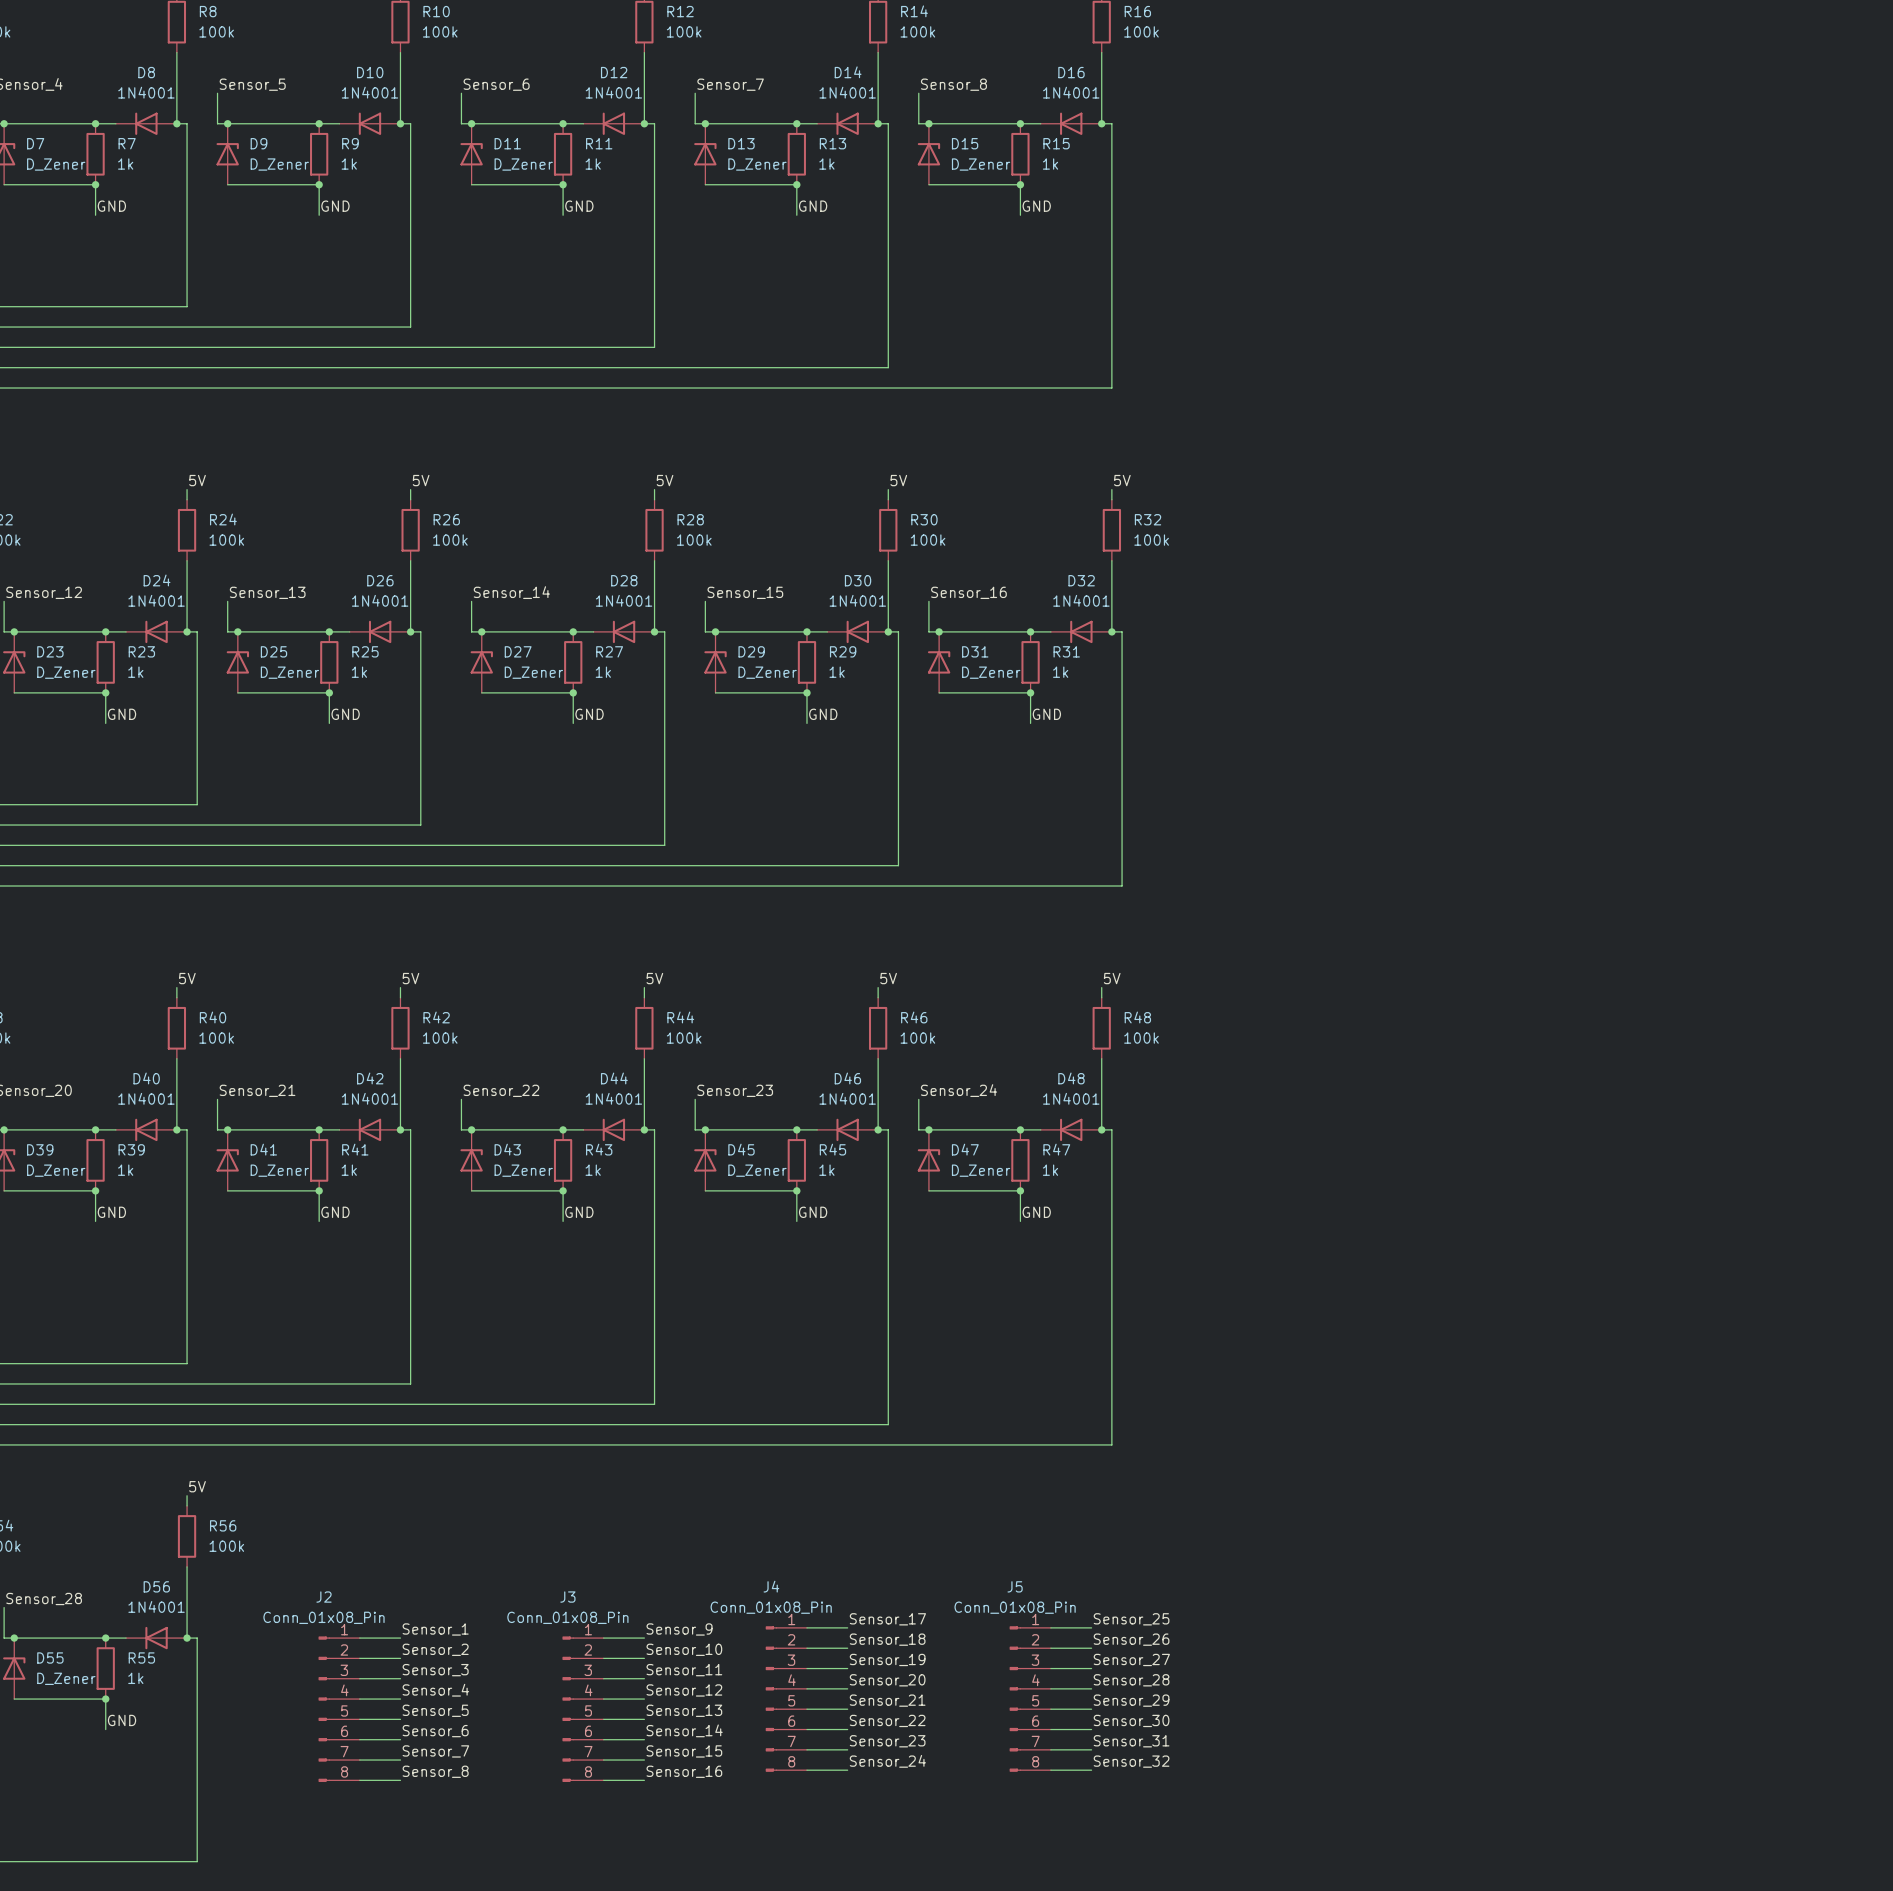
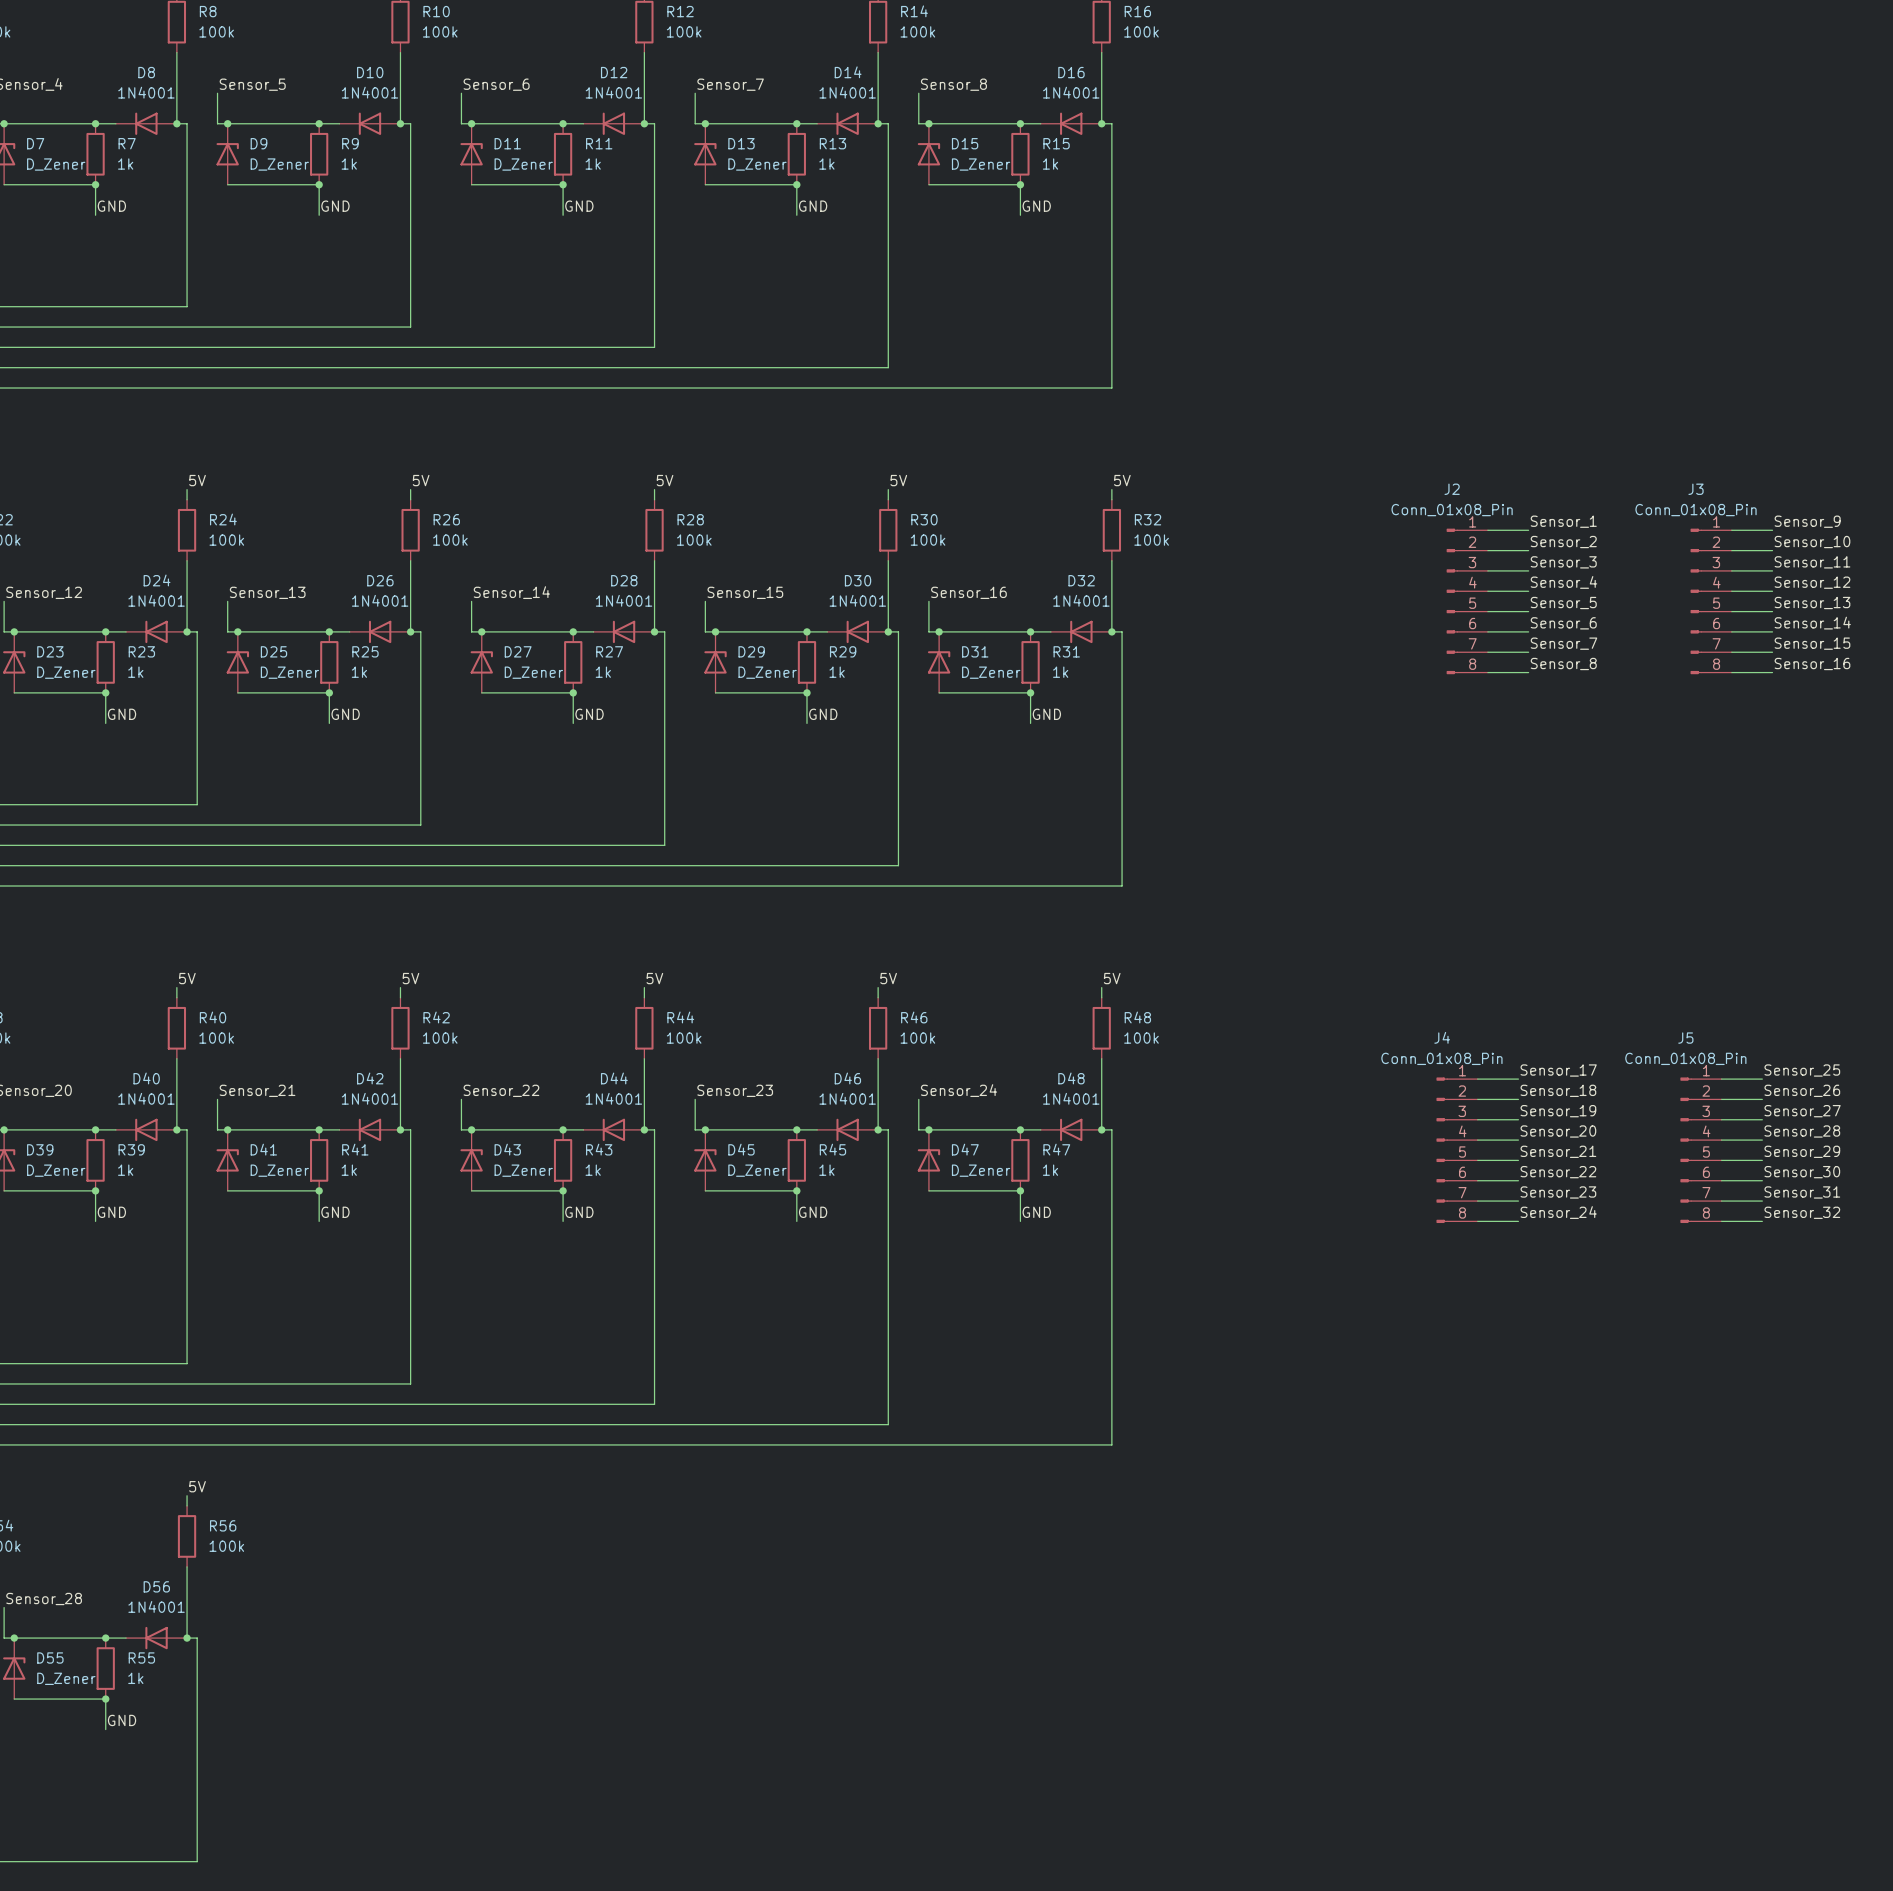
label: none -> Sensor_1 (1563, 521)
label: none -> Sensor_9 (1807, 521)
wire: none -> (1487, 530) (1528, 530)
wire: none -> (1731, 530) (1772, 530)
label: none -> Sensor_2 (1563, 542)
label: none -> Sensor_10 (1812, 542)
wire: none -> (1487, 550) (1528, 550)
wire: none -> (1731, 550) (1772, 550)
label: none -> Sensor_3 (1563, 562)
label: none -> Sensor_11 (1812, 562)
wire: none -> (1487, 570) (1528, 570)
wire: none -> (1731, 570) (1772, 570)
label: none -> Sensor_4 (1563, 582)
label: none -> Sensor_12 (1812, 582)
wire: none -> (1487, 591) (1528, 591)
wire: none -> (1731, 591) (1772, 591)
label: none -> Sensor_5 (1563, 603)
label: none -> Sensor_13 (1812, 603)
wire: none -> (1487, 611) (1528, 611)
wire: none -> (1731, 611) (1772, 611)
label: none -> Sensor_6 (1563, 623)
label: none -> Sensor_14 (1812, 623)
wire: none -> (1487, 631) (1528, 631)
wire: none -> (1731, 631) (1772, 631)
label: none -> Sensor_7 (1563, 643)
label: none -> Sensor_15 (1812, 643)
wire: none -> (1487, 652) (1528, 652)
wire: none -> (1731, 652) (1772, 652)
label: none -> Sensor_8 (1563, 663)
label: none -> Sensor_16 (1812, 663)
wire: none -> (1487, 672) (1528, 672)
wire: none -> (1731, 672) (1772, 672)
label: none -> Sensor_17 (1558, 1070)
label: none -> Sensor_25 (1802, 1070)
wire: none -> (1477, 1079) (1518, 1079)
wire: none -> (1721, 1079) (1762, 1079)
label: none -> Sensor_18 (1558, 1090)
label: none -> Sensor_26 (1802, 1090)
wire: none -> (1477, 1099) (1518, 1099)
wire: none -> (1721, 1099) (1762, 1099)
label: none -> Sensor_19 (1558, 1111)
label: none -> Sensor_27 (1802, 1111)
wire: none -> (1477, 1119) (1518, 1119)
wire: none -> (1721, 1119) (1762, 1119)
label: none -> Sensor_20 (1558, 1131)
label: none -> Sensor_28 (1802, 1131)
wire: none -> (1477, 1140) (1518, 1140)
wire: none -> (1721, 1140) (1762, 1140)
label: none -> Sensor_21 (1558, 1151)
label: none -> Sensor_29 (1802, 1151)
wire: none -> (1477, 1160) (1518, 1160)
wire: none -> (1721, 1160) (1762, 1160)
label: none -> Sensor_22 (1558, 1172)
label: none -> Sensor_30 (1802, 1172)
wire: none -> (1477, 1180) (1518, 1180)
wire: none -> (1721, 1180) (1762, 1180)
label: none -> Sensor_23 (1558, 1192)
label: none -> Sensor_31 (1802, 1192)
wire: none -> (1477, 1201) (1518, 1201)
wire: none -> (1721, 1201) (1762, 1201)
label: none -> Sensor_24 (1558, 1212)
label: none -> Sensor_32 (1802, 1212)
wire: none -> (1477, 1221) (1518, 1221)
wire: none -> (1721, 1221) (1762, 1221)
label: Sensor_17 (887, 1619) -> none
label: Sensor_25 (1131, 1619) -> none
wire: (806, 1627) (847, 1627) -> none
wire: (1050, 1627) (1091, 1627) -> none
label: Sensor_1 (435, 1629) -> none
label: Sensor_9 (679, 1629) -> none
wire: (359, 1638) (400, 1638) -> none
wire: (603, 1638) (644, 1638) -> none
label: Sensor_18 (887, 1639) -> none
label: Sensor_26 (1131, 1639) -> none
wire: (806, 1648) (847, 1648) -> none
wire: (1050, 1648) (1091, 1648) -> none
label: Sensor_2 (435, 1649) -> none
label: Sensor_10 (684, 1649) -> none
wire: (359, 1658) (400, 1658) -> none
wire: (603, 1658) (644, 1658) -> none
label: Sensor_19 (887, 1659) -> none
label: Sensor_27 (1131, 1659) -> none
wire: (806, 1668) (847, 1668) -> none
wire: (1050, 1668) (1091, 1668) -> none
label: Sensor_3 (435, 1670) -> none
label: Sensor_11 (684, 1670) -> none
wire: (359, 1678) (400, 1678) -> none
wire: (603, 1678) (644, 1678) -> none
label: Sensor_20 (887, 1680) -> none
label: Sensor_28 (1131, 1680) -> none
wire: (806, 1688) (847, 1688) -> none
wire: (1050, 1688) (1091, 1688) -> none
label: Sensor_4 (435, 1690) -> none
label: Sensor_12 (684, 1690) -> none
wire: (359, 1699) (400, 1699) -> none
wire: (603, 1699) (644, 1699) -> none
J4 position: (786, 1699) -> (1457, 1150)
J5 position: (1030, 1699) -> (1701, 1150)
label: Sensor_21 (887, 1700) -> none
label: Sensor_29 (1131, 1700) -> none
J2 position: (339, 1709) -> (1467, 601)
J3 position: (583, 1709) -> (1711, 601)
wire: (806, 1709) (847, 1709) -> none
wire: (1050, 1709) (1091, 1709) -> none
label: Sensor_5 (435, 1710) -> none
label: Sensor_13 (684, 1710) -> none
wire: (359, 1719) (400, 1719) -> none
wire: (603, 1719) (644, 1719) -> none
label: Sensor_22 (887, 1720) -> none
label: Sensor_30 (1131, 1720) -> none
wire: (806, 1729) (847, 1729) -> none
wire: (1050, 1729) (1091, 1729) -> none
label: Sensor_14 (684, 1730) -> none
label: Sensor_6 (435, 1731) -> none
wire: (359, 1739) (400, 1739) -> none
wire: (603, 1739) (644, 1739) -> none
label: Sensor_23 (887, 1741) -> none
label: Sensor_31 (1131, 1741) -> none
wire: (806, 1749) (847, 1749) -> none
wire: (1050, 1749) (1091, 1749) -> none
label: Sensor_7 (435, 1751) -> none
label: Sensor_15 (684, 1751) -> none
wire: (359, 1760) (400, 1760) -> none
wire: (603, 1760) (644, 1760) -> none
label: Sensor_24 (887, 1761) -> none
label: Sensor_32 (1131, 1761) -> none
wire: (806, 1770) (847, 1770) -> none
wire: (1050, 1770) (1091, 1770) -> none
label: Sensor_8 (435, 1771) -> none
label: Sensor_16 (684, 1771) -> none
wire: (359, 1780) (400, 1780) -> none
wire: (603, 1780) (644, 1780) -> none

